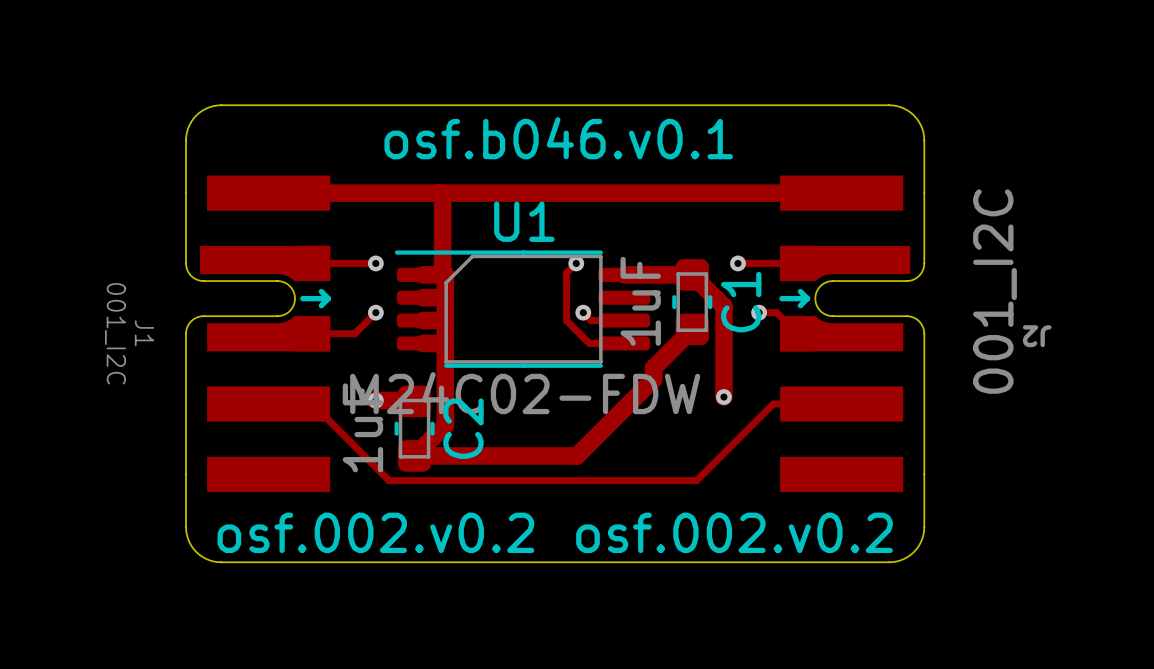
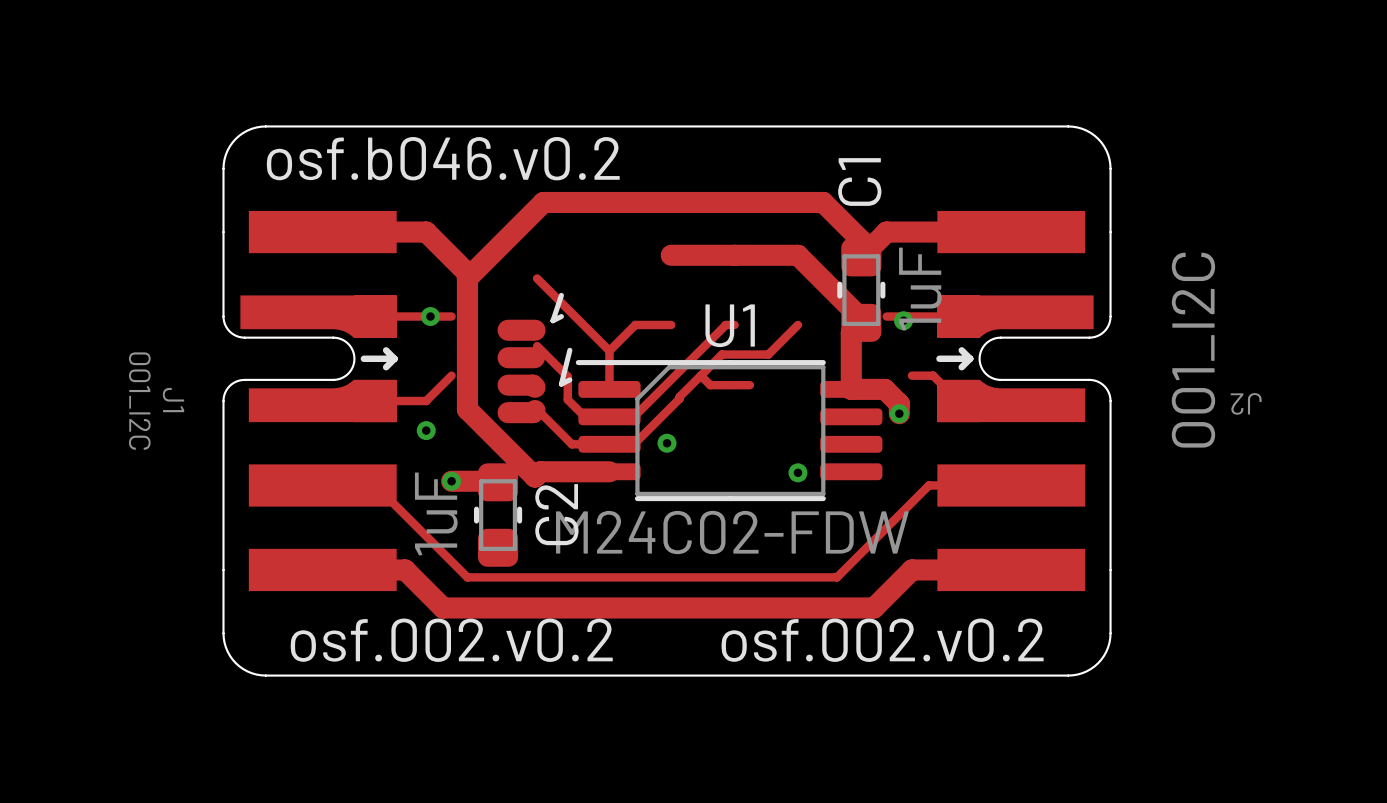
text: osf.b046.v0.1 (558, 138) -> osf.b046.v0.2 (443, 158)
track: (354, 193) (737, 193) -> (467, 278) (543, 202) (823, 202) (861, 240) (861, 257) (886, 232)
track: none -> (426, 232) (467, 273) (467, 409) (535, 477) (540, 471) (609, 471)
track: (439, 193) (442, 196) (442, 272) (445, 274) (445, 425) (414, 455) (576, 455) (653, 379) (653, 368) (692, 329) -> none
track: none -> (671, 255) (797, 255) (861, 318) (861, 322) (851, 332) (851, 389) (884, 389) (899, 403) (899, 413)
track: none -> (537, 278) (609, 350)
line: none -> (561, 295) (552, 320) (561, 316)
via position: (375, 263) -> (430, 316)
track: (576, 263) (566, 273) (566, 320) (589, 343) (624, 343) -> none
via: (576, 263) -> none
via position: (737, 263) -> (903, 320)
track: none -> (671, 324) (635, 324) (609, 350)
track: none -> (734, 324) (725, 324) (634, 416) (584, 416) (567, 399) (567, 376) (537, 346)
track: none -> (797, 324) (768, 354) (721, 354) (634, 444) (571, 444) (537, 409)
track: (624, 274) (692, 274) (723, 306) (723, 397) -> none
line: none -> (569, 350) (561, 384) (569, 379)
track: none -> (609, 350) (609, 389)
C1 value position: 1uF (640, 301) -> 1uF (920, 289)
C1 position: (692, 302) -> (861, 290)
C1 name position: C1 (741, 302) -> C1 (859, 181)
U1 position: (522, 309) -> (729, 430)
via: (375, 312) -> none
via: (583, 312) -> none
via: (759, 312) -> none
via: none -> (899, 413)
via: none -> (426, 430)
via: none -> (667, 443)
via: none -> (797, 472)
via: (723, 397) -> none
track: none -> (322, 569) (405, 569) (443, 607) (873, 607) (912, 569) (1011, 569)

